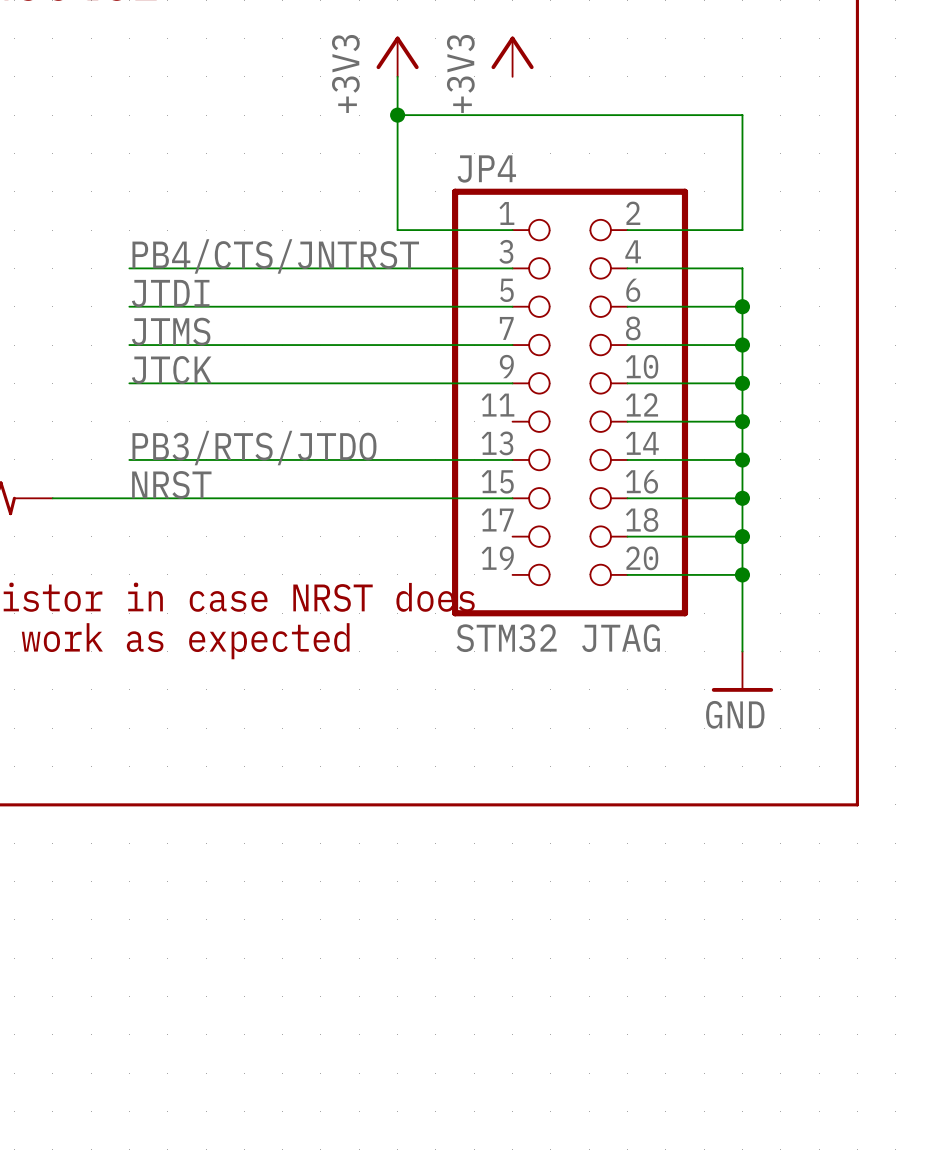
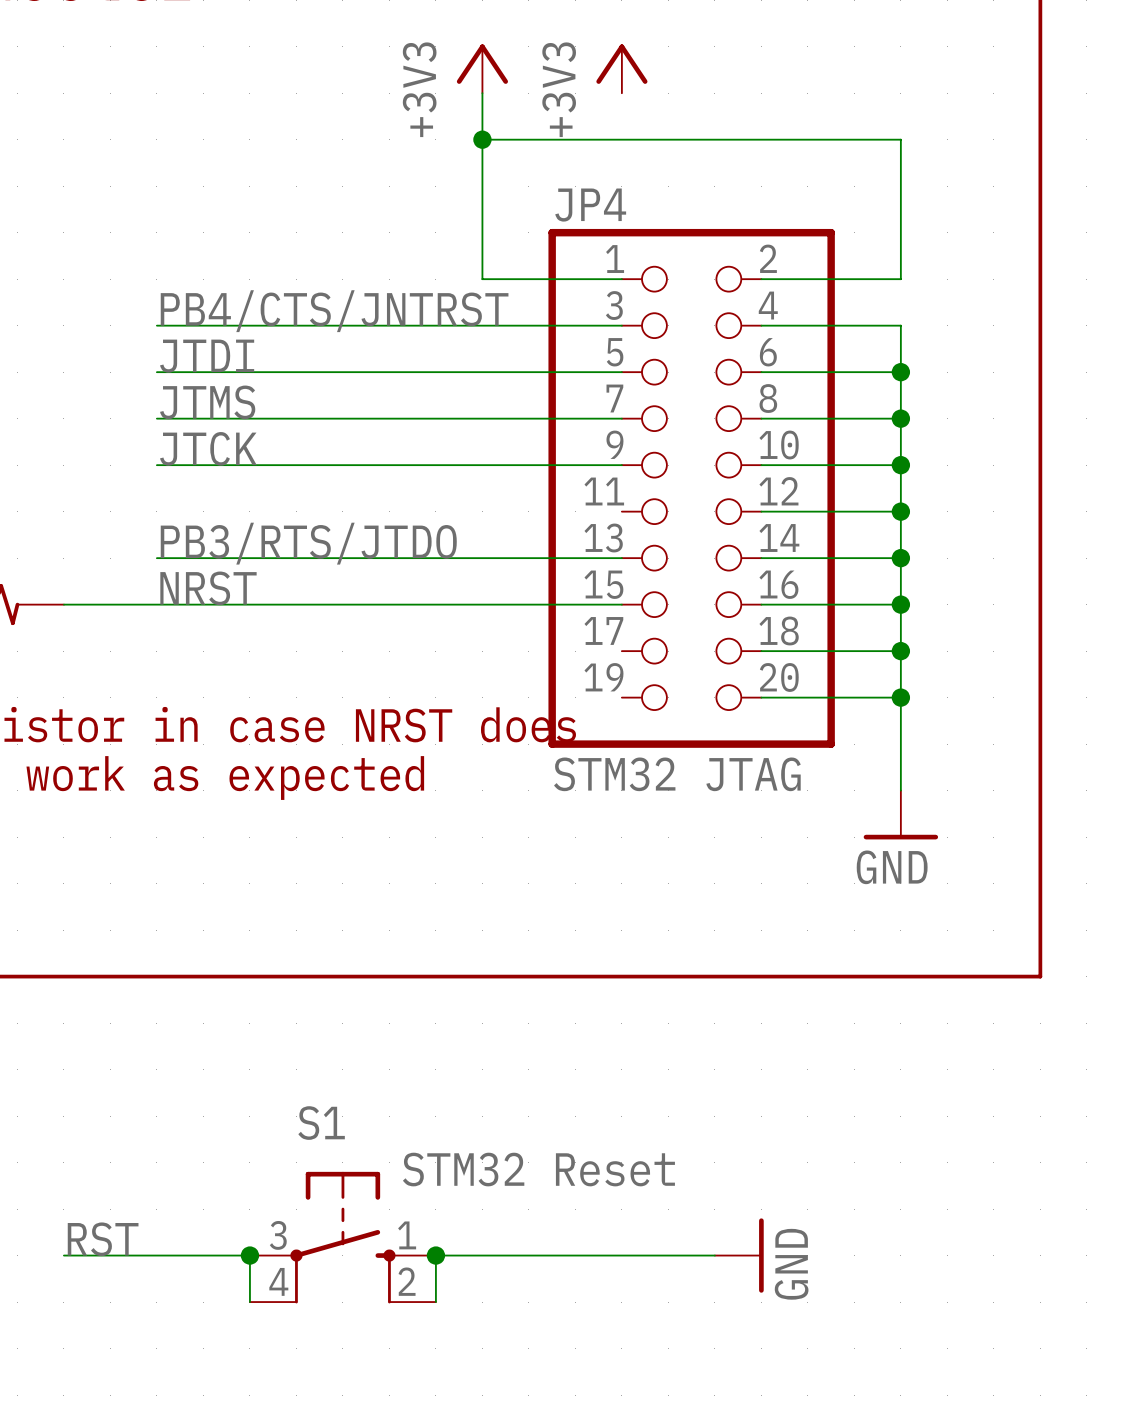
S1: none -> STM32 Reset (342, 1237)
label: none -> RST (103, 1239)
wire: none -> (63, 1255) (249, 1255) (249, 1302)
junction: none -> (249, 1255)
junction: none -> (435, 1255)
wire: none -> (714, 1255) (435, 1255) (435, 1302)
power symbol: none -> GND (739, 1255)

